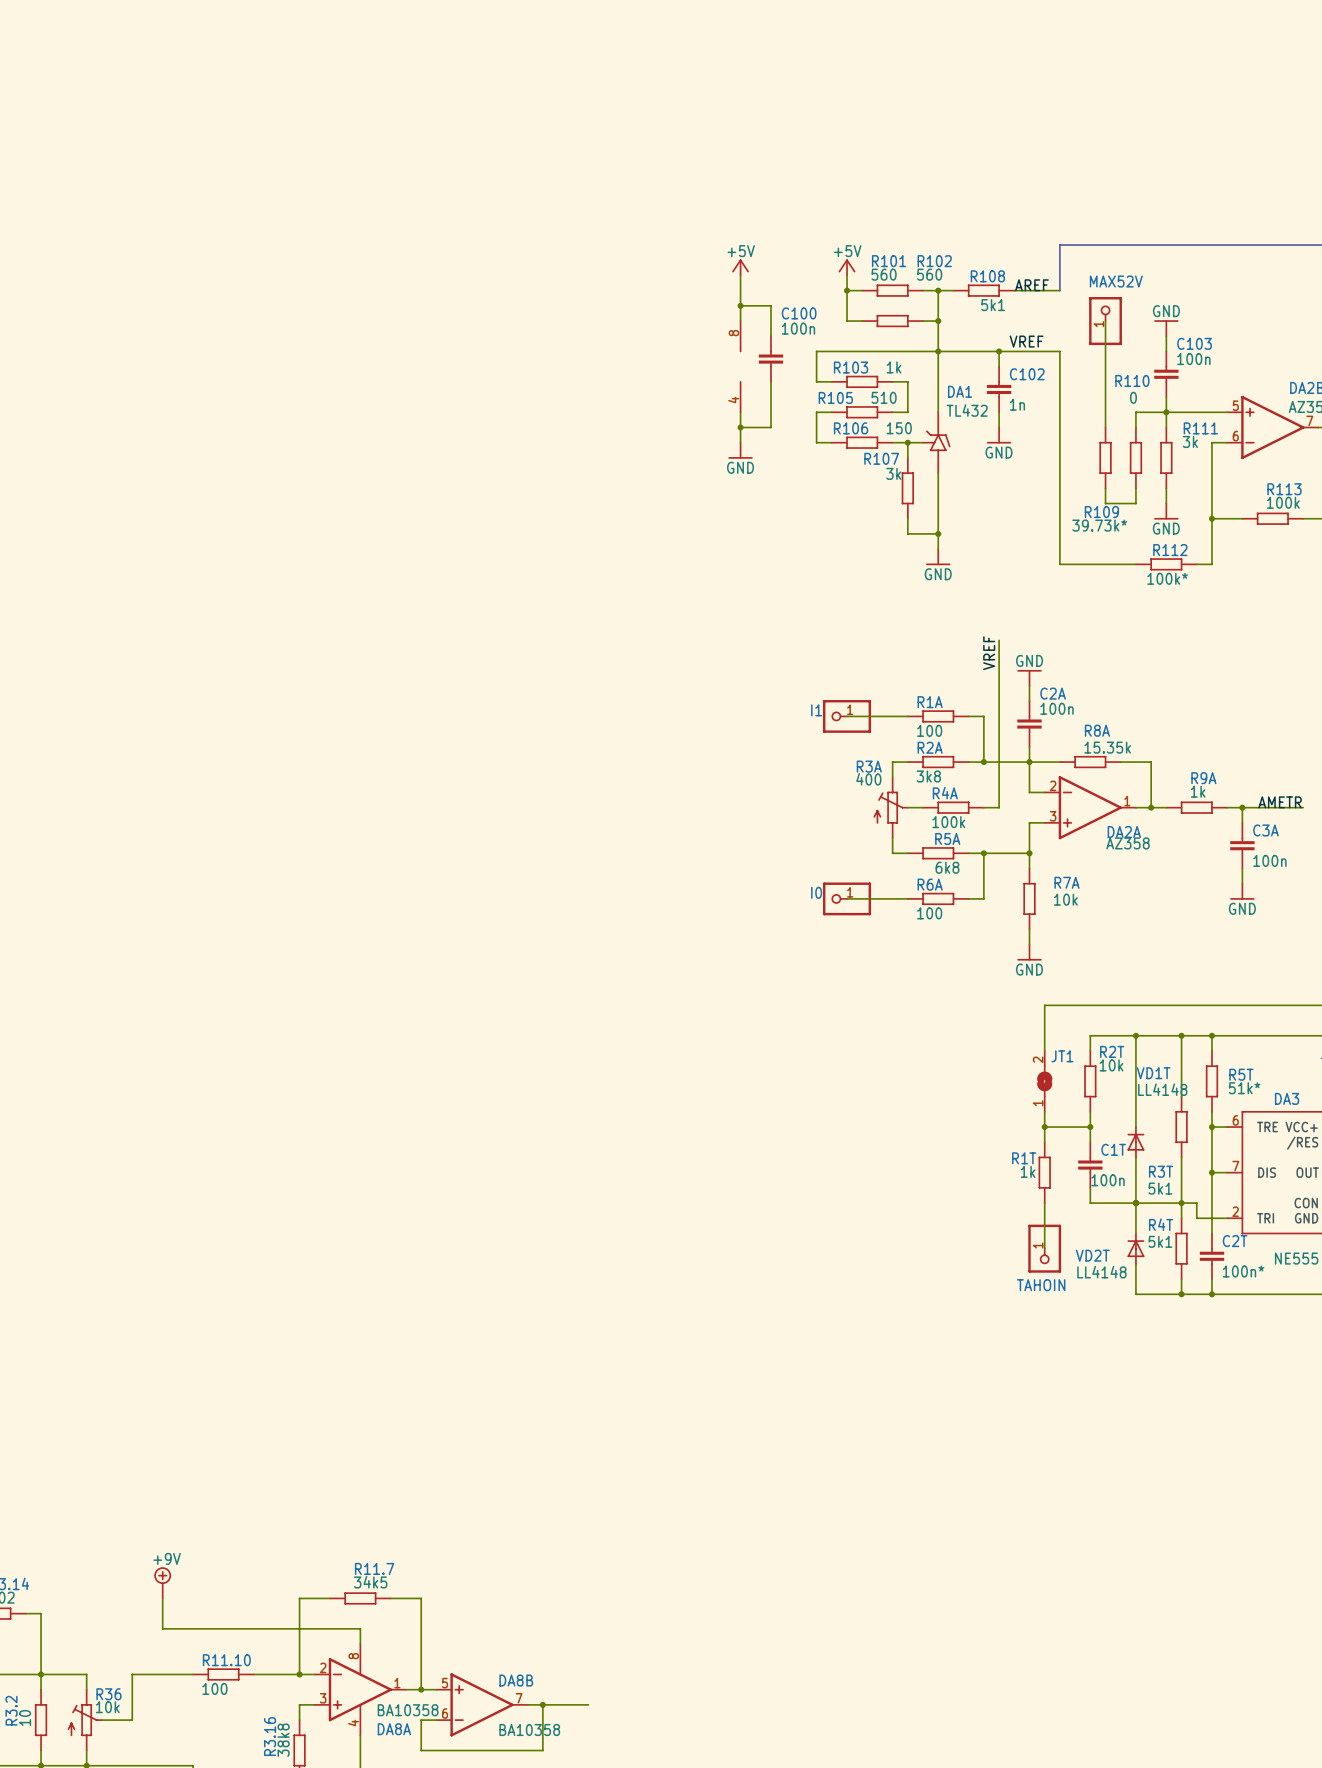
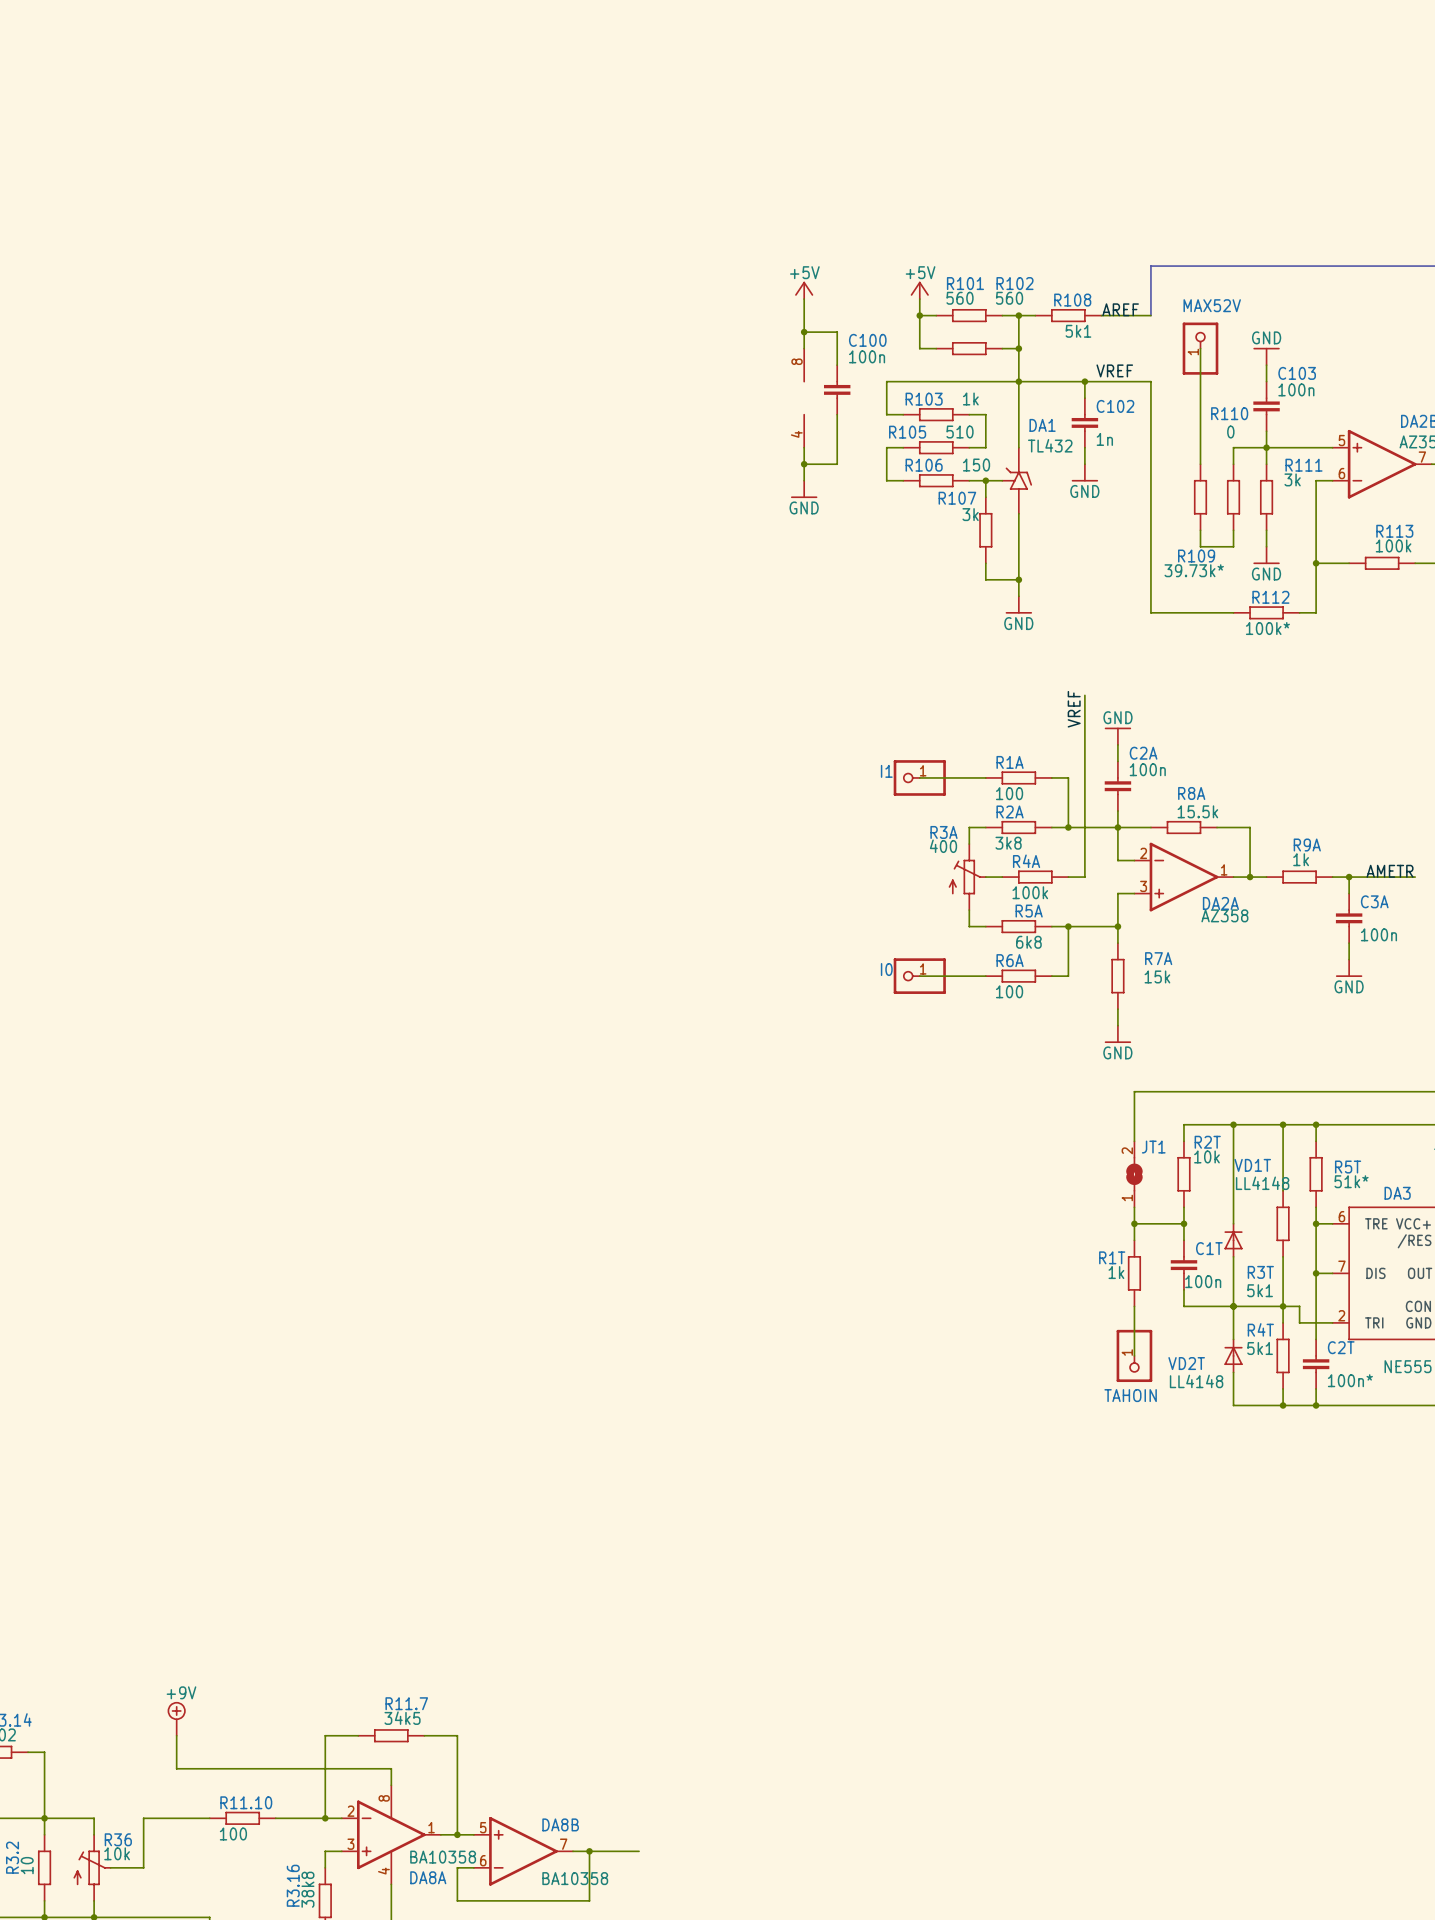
R8A value: 15.35k (1107, 747) -> 15.5k (1197, 811)
R7A value: 10k (1065, 899) -> 15k (1157, 976)

